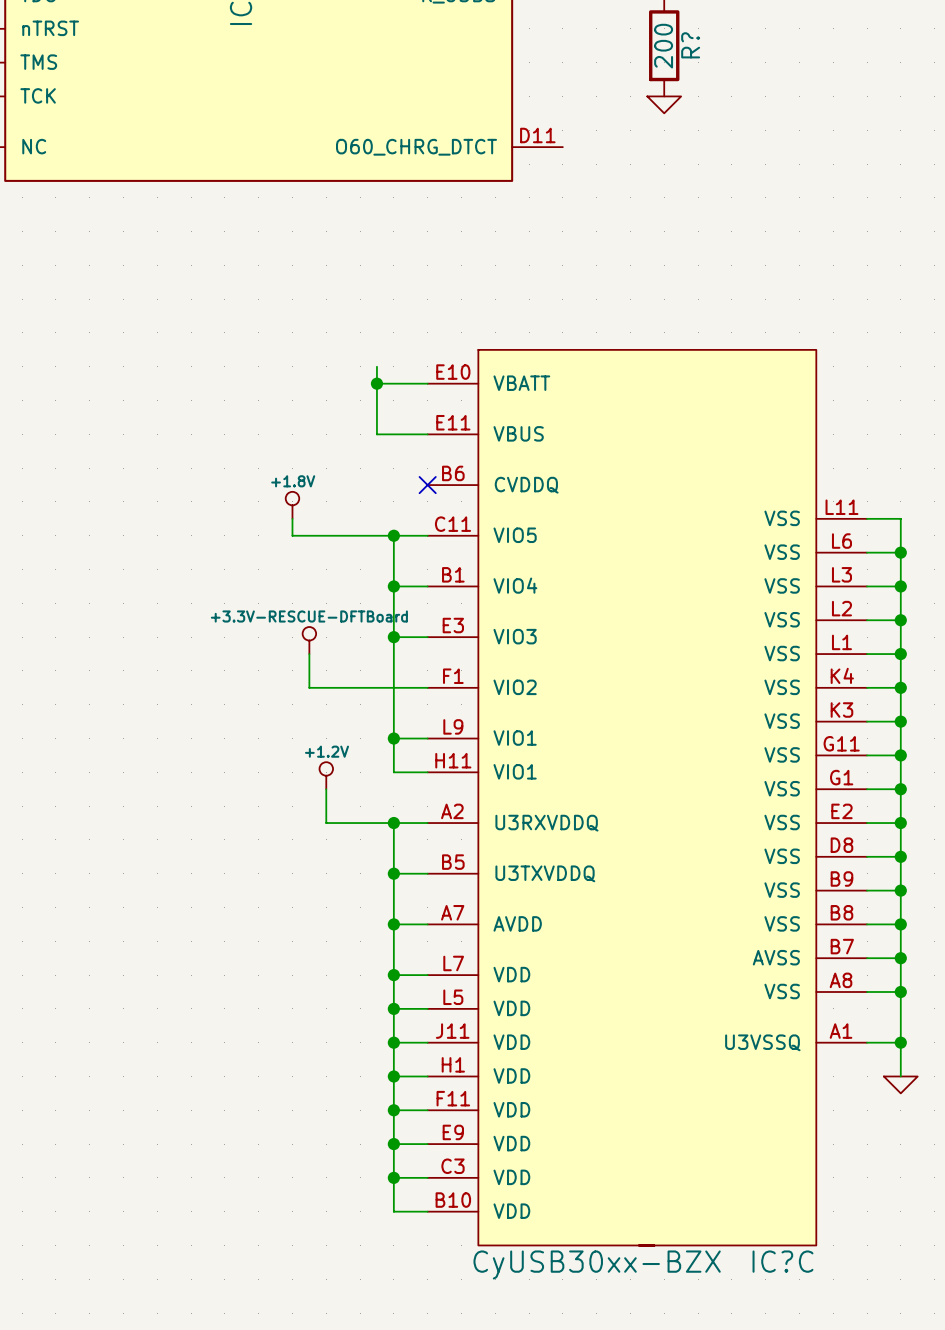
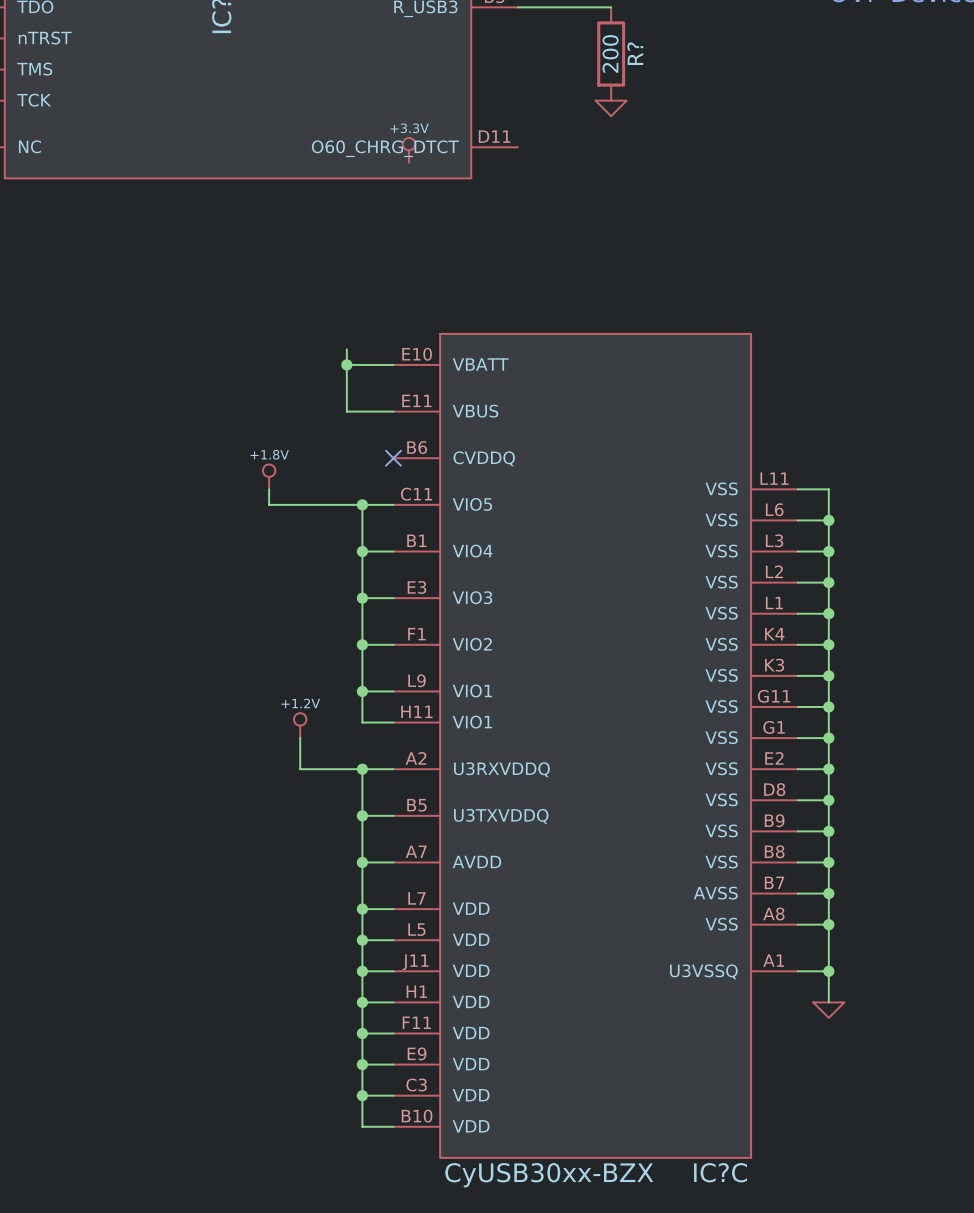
power symbol: none -> +3.3V (409, 150)
power symbol: +3.3V-RESCUE-DFTBoard (309, 640) -> none
wire: (309, 654) (309, 687) (393, 687) -> none
junction: none -> (362, 644)

